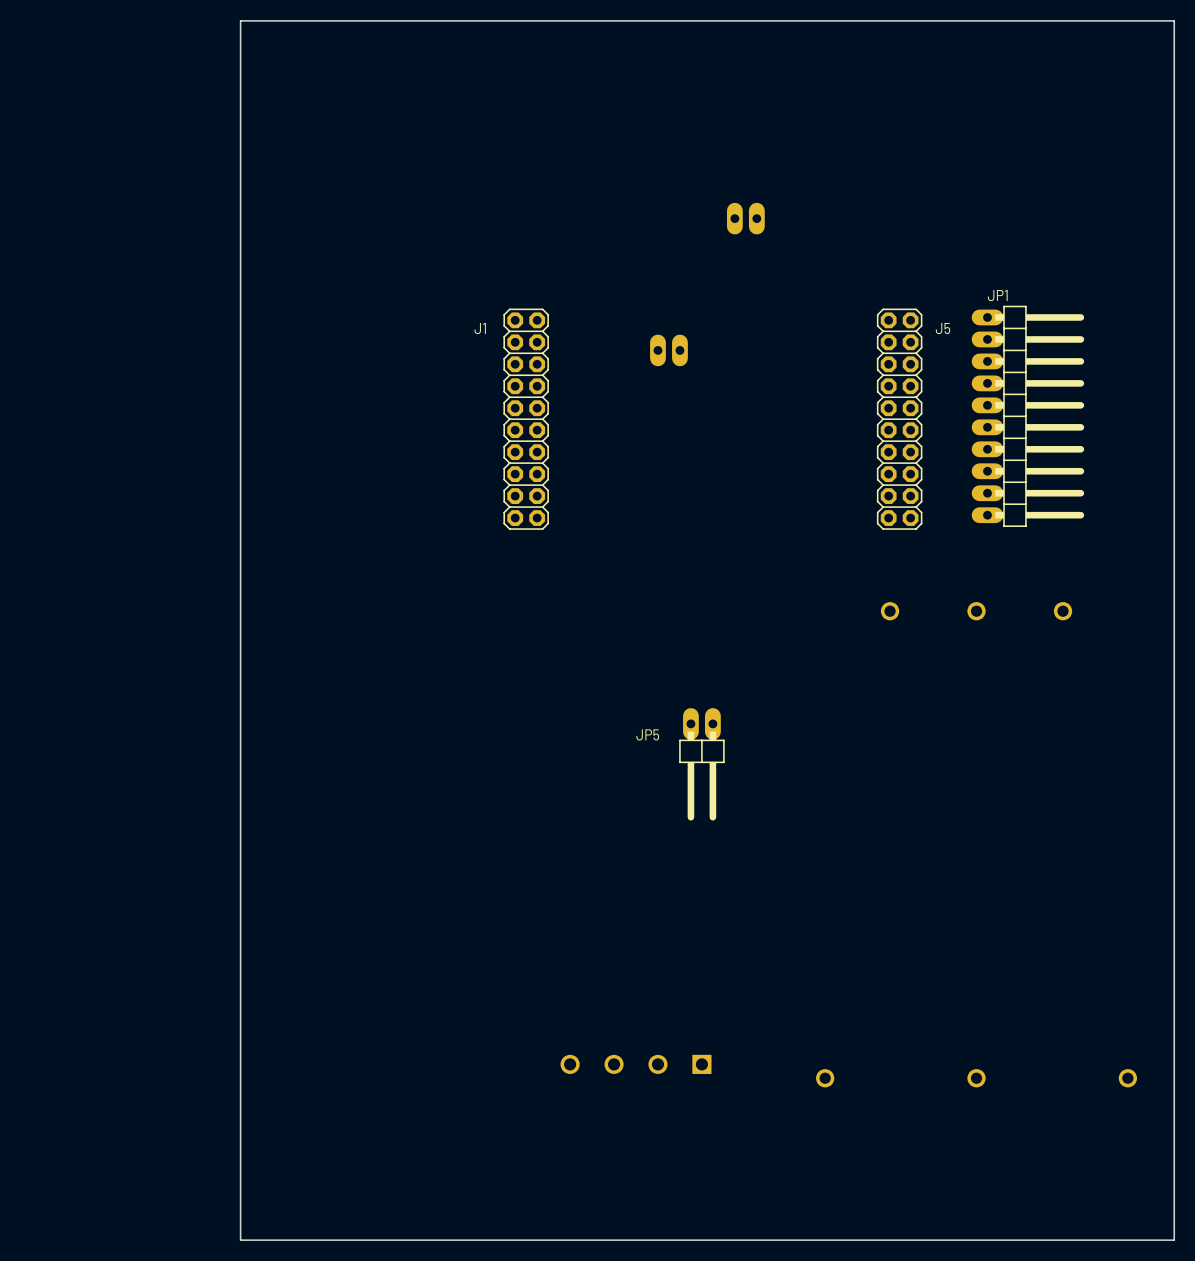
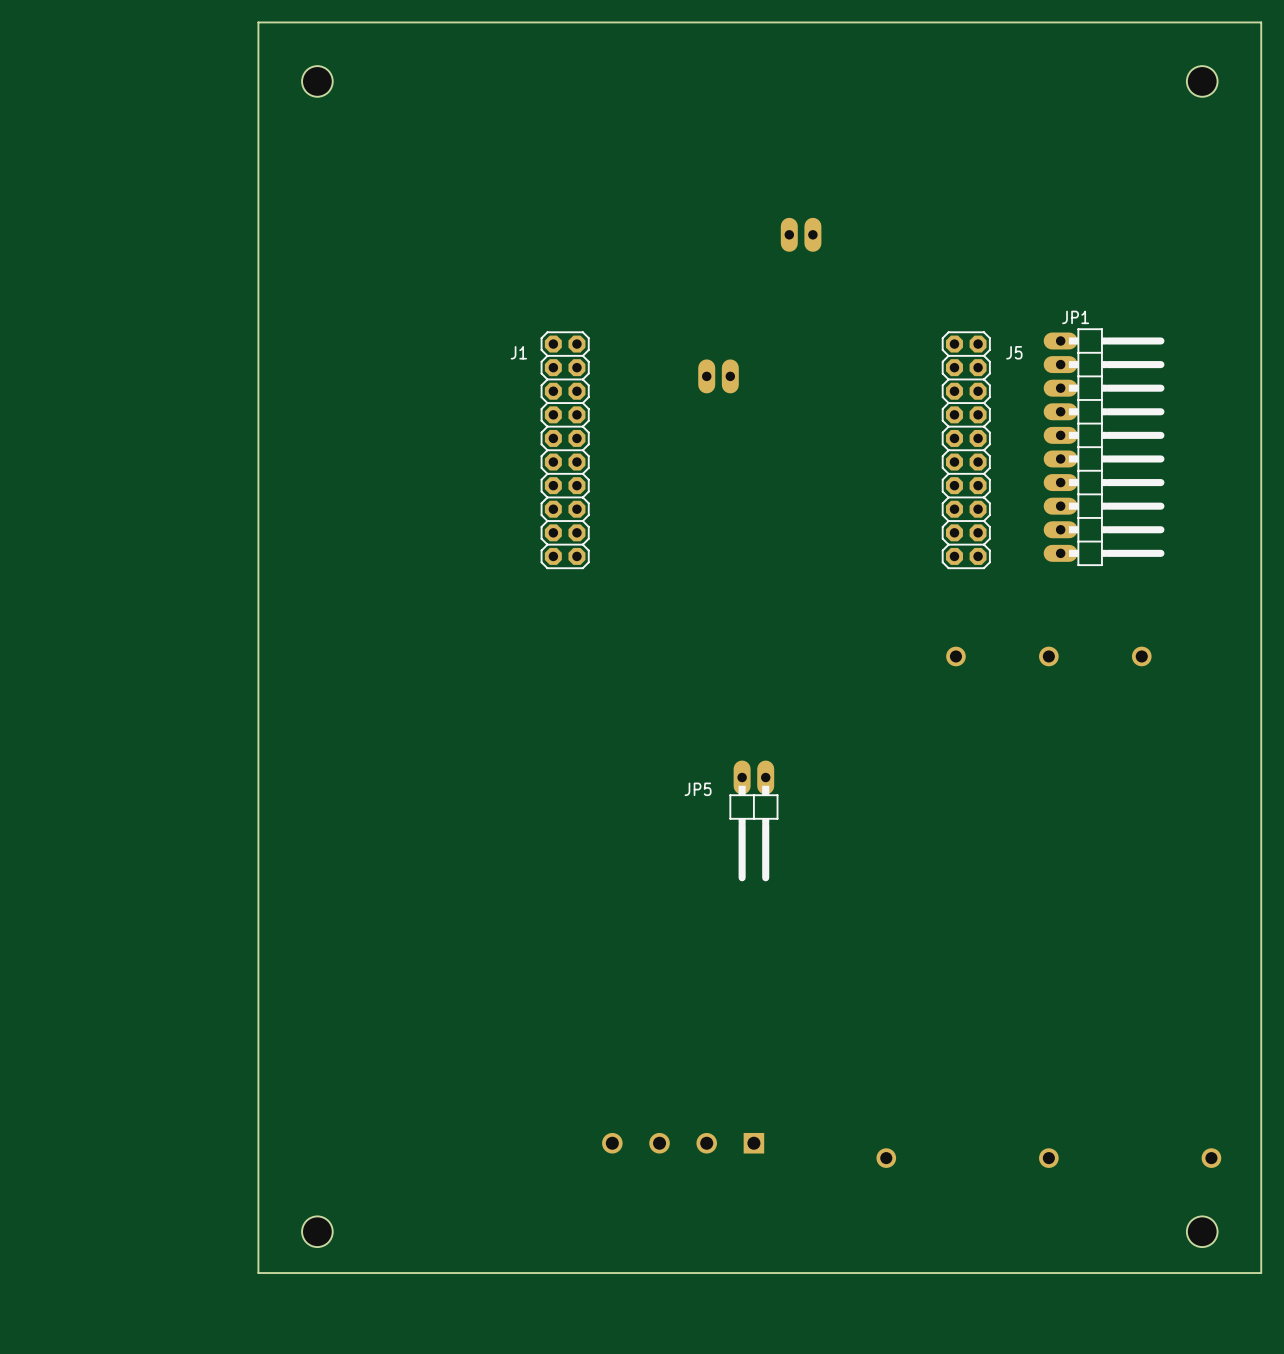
hole: none -> (317, 81)
hole: none -> (1202, 81)
hole: none -> (317, 1231)
hole: none -> (1202, 1231)
board edge: (240, 1185) (240, 1240) (1174, 1240) (1174, 1185) -> (258, 1273) (1261, 1273)

